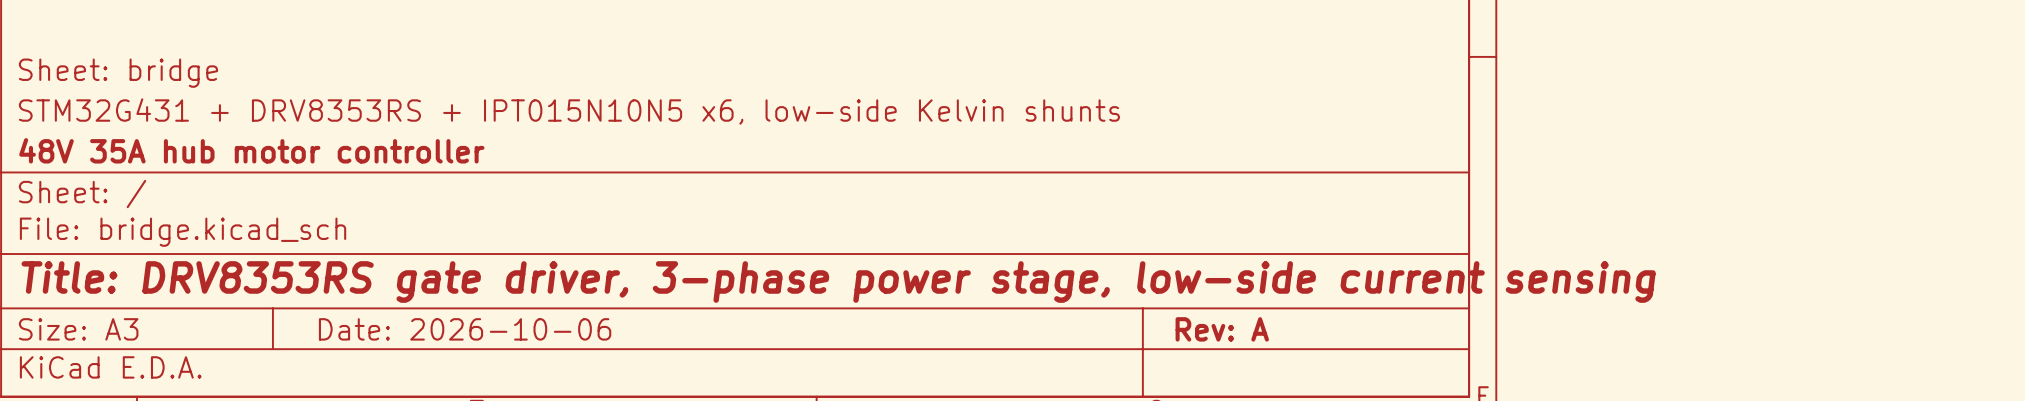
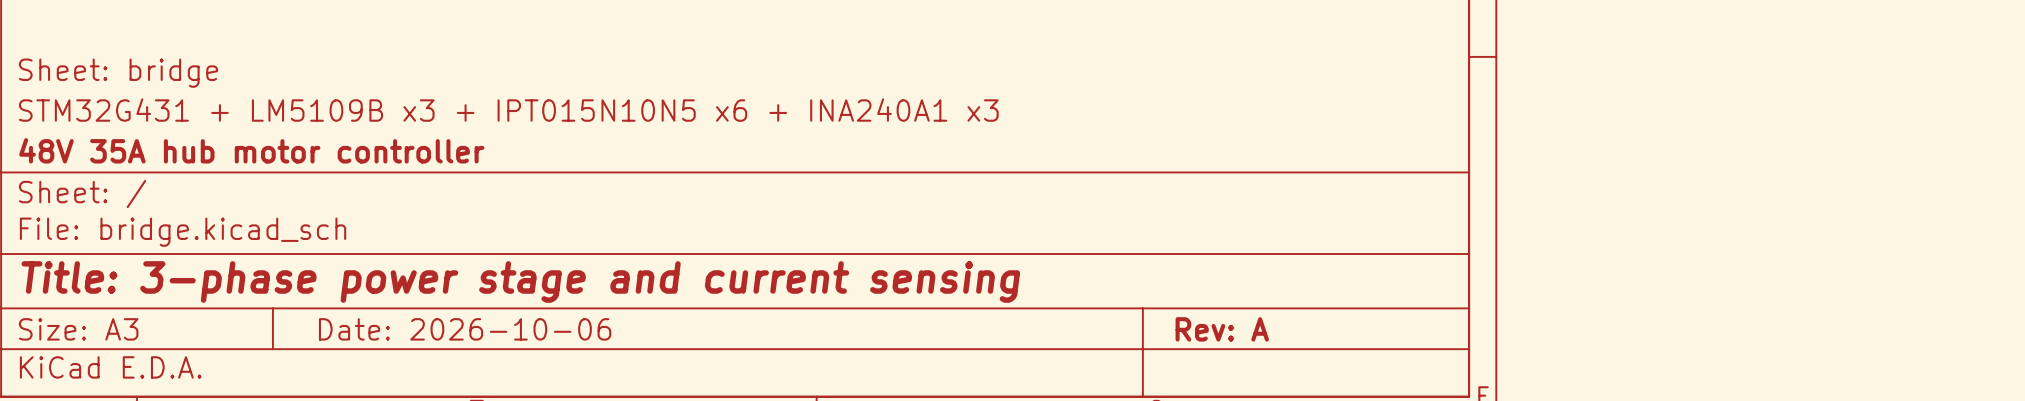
title block: STM32G431 + DRV8353RS + IPT015N10N5 x6, low-side Kelvin shunts (569, 111) -> STM32G431 + LM5109B x3 + IPT015N10N5 x6 + INA240A1 x3 (508, 110)
title block: Title: DRV8353RS gate driver, 3-phase power stage, low-side current sensing (838, 281) -> Title: 3-phase power stage and current sensing (520, 281)

